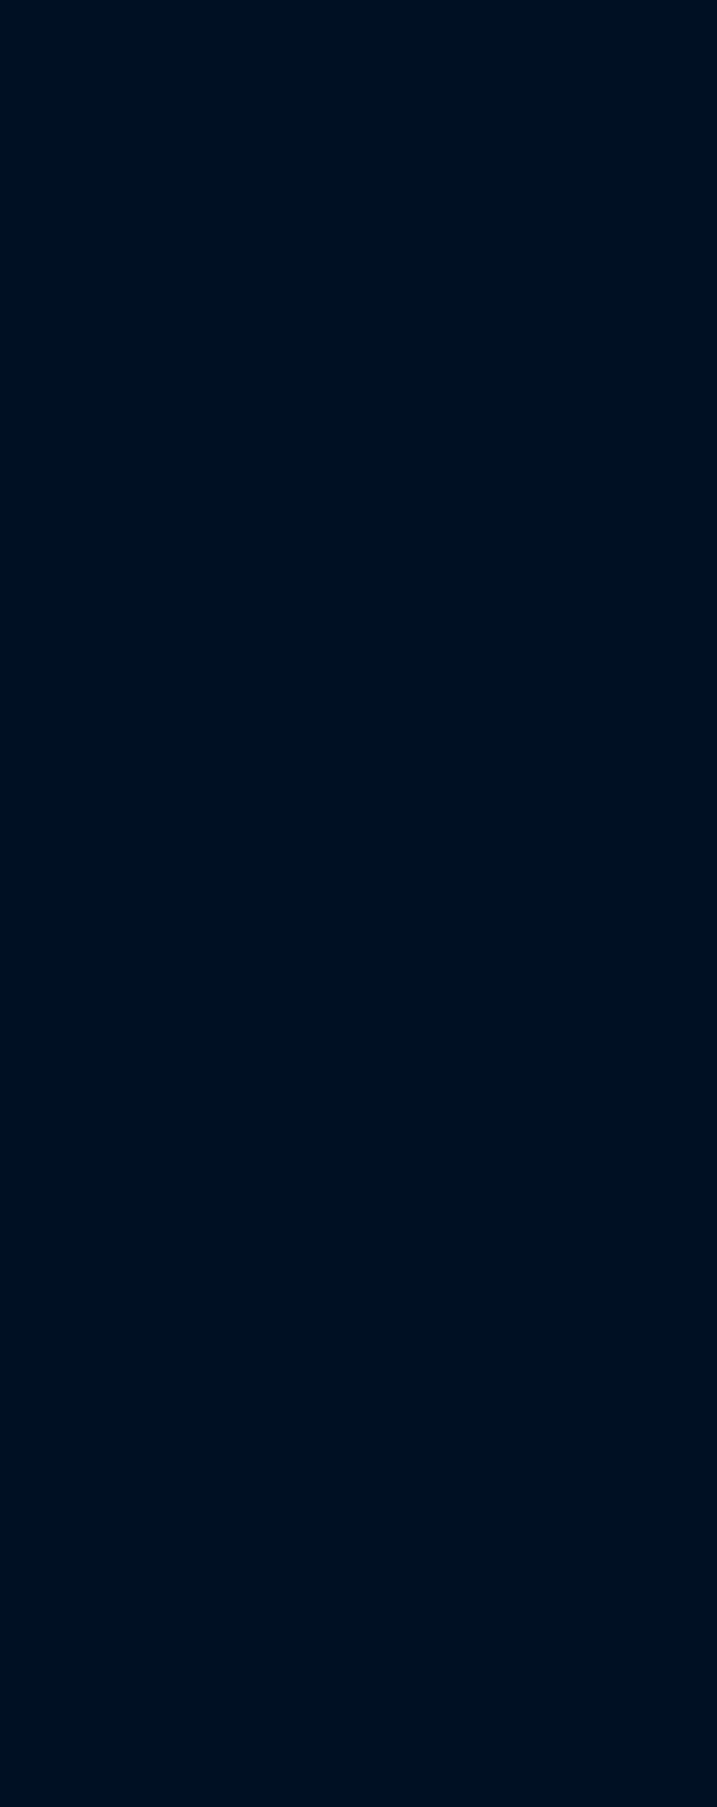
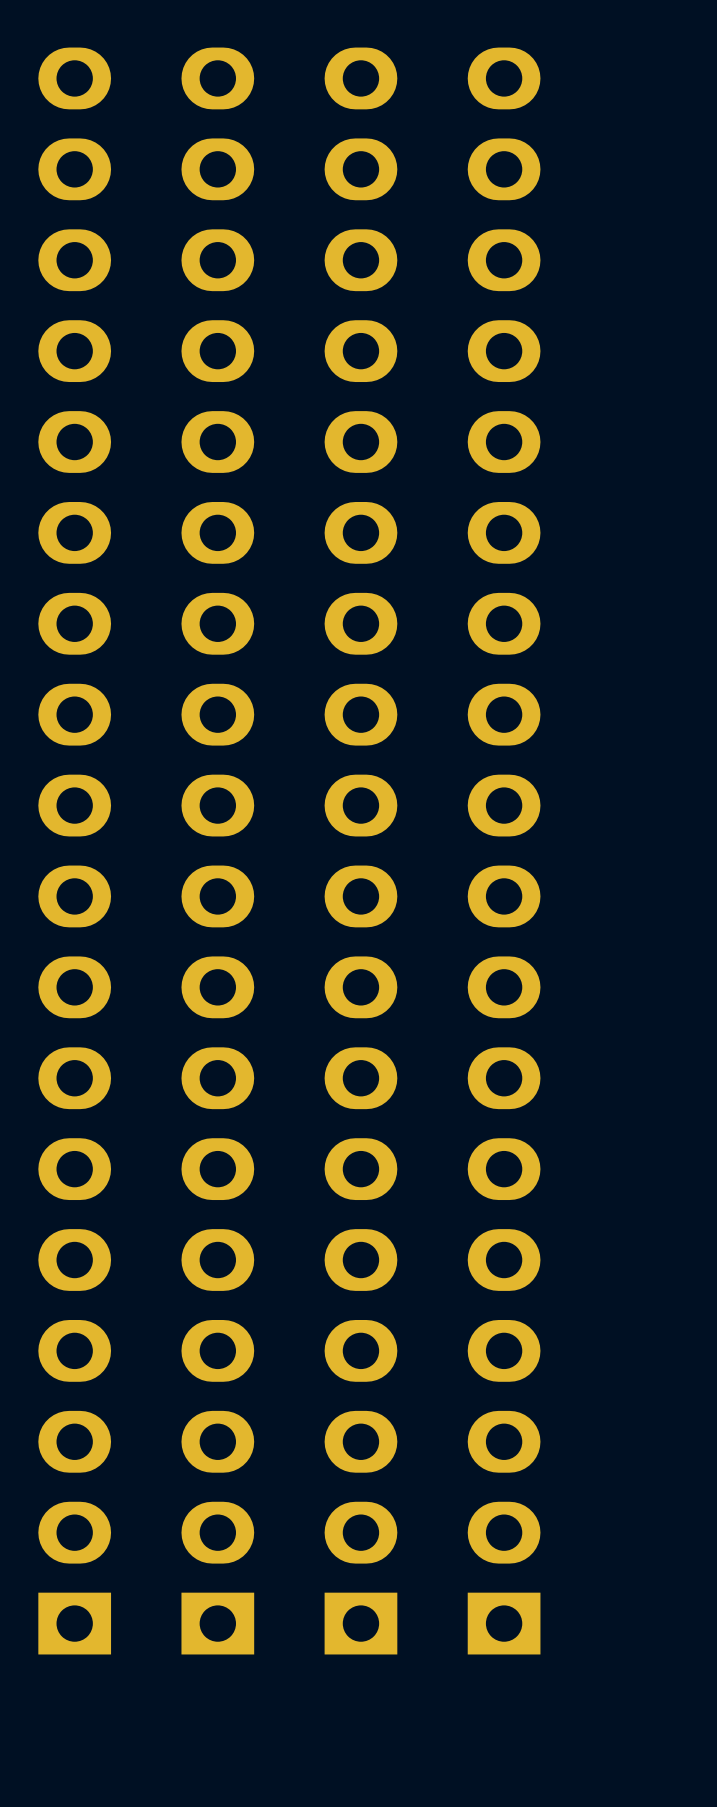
part: none -> (74, 851)
part: none -> (217, 851)
part: none -> (360, 851)
part: none -> (504, 851)

